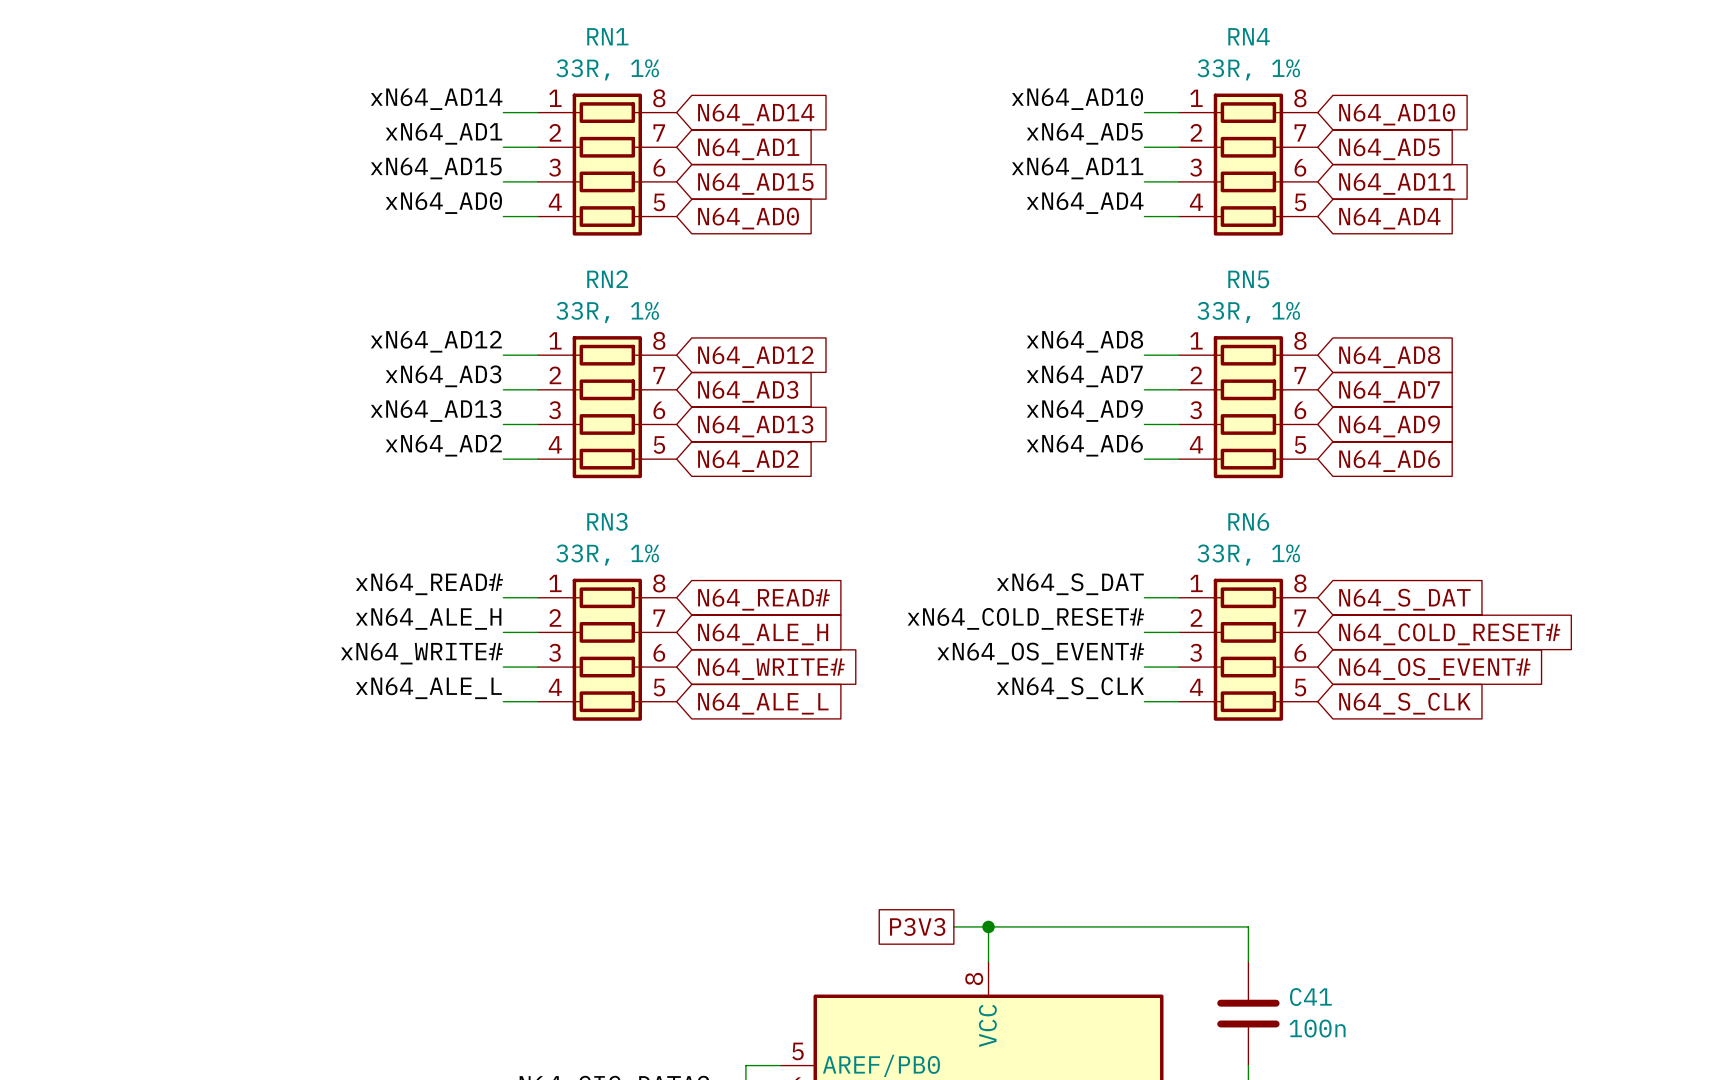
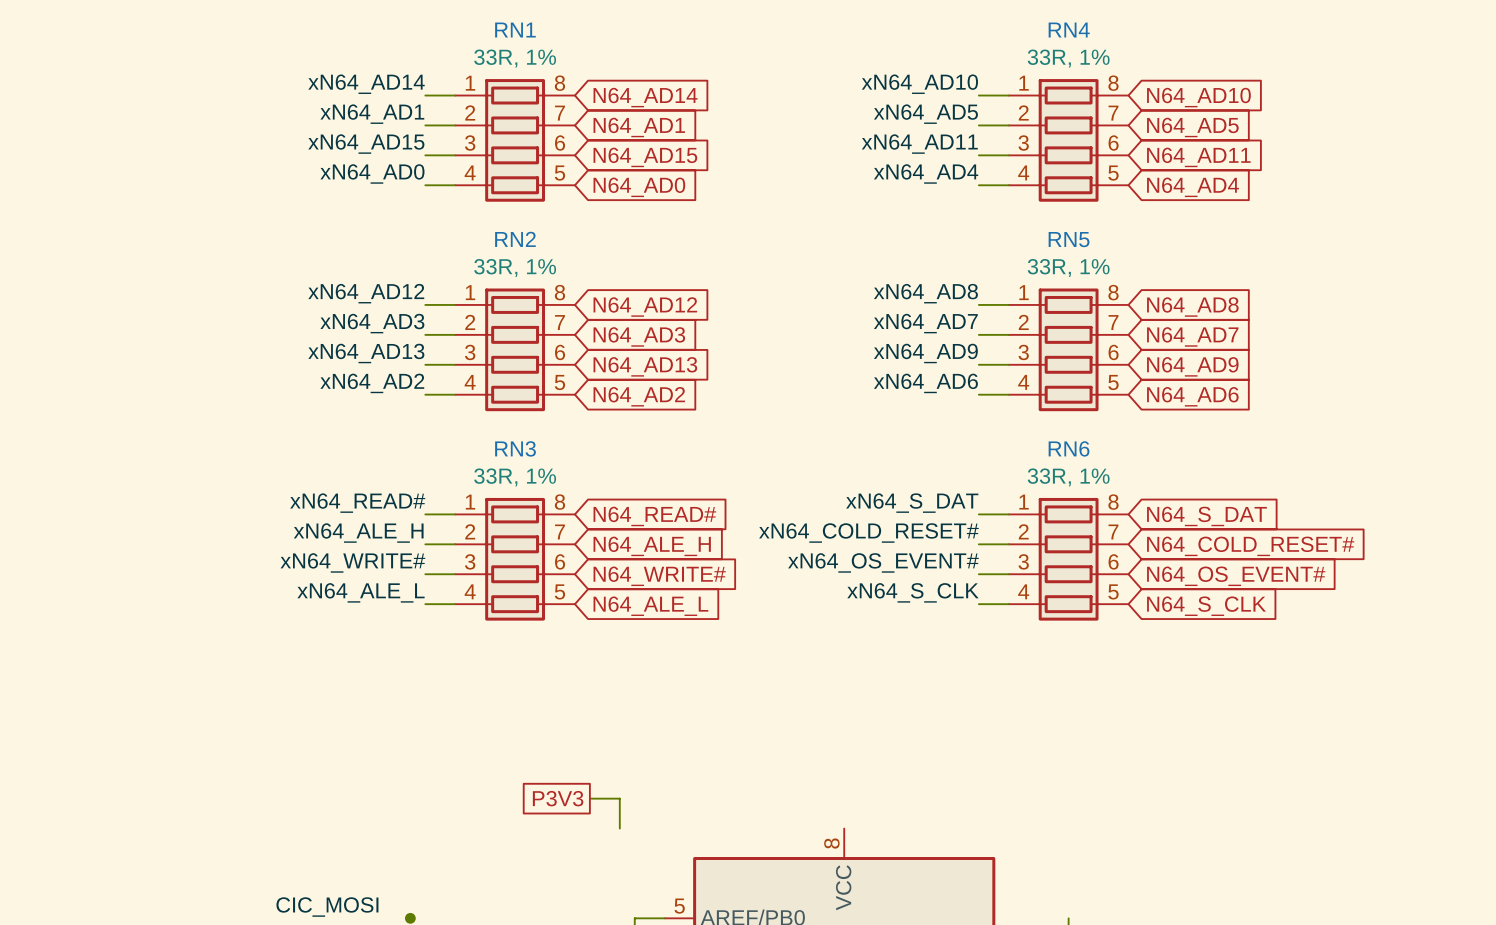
wire: none -> (589, 798) (619, 798) (619, 828)
global label position: P3V3 (917, 926) -> P3V3 (558, 798)
wire: (953, 926) (1248, 926) (1248, 961) -> none
wire: (988, 926) (988, 961) -> none
junction: (988, 926) -> none
C41: 100n (1248, 1013) -> none
label: none -> CIC_MOSI (327, 907)
junction: none -> (410, 918)

